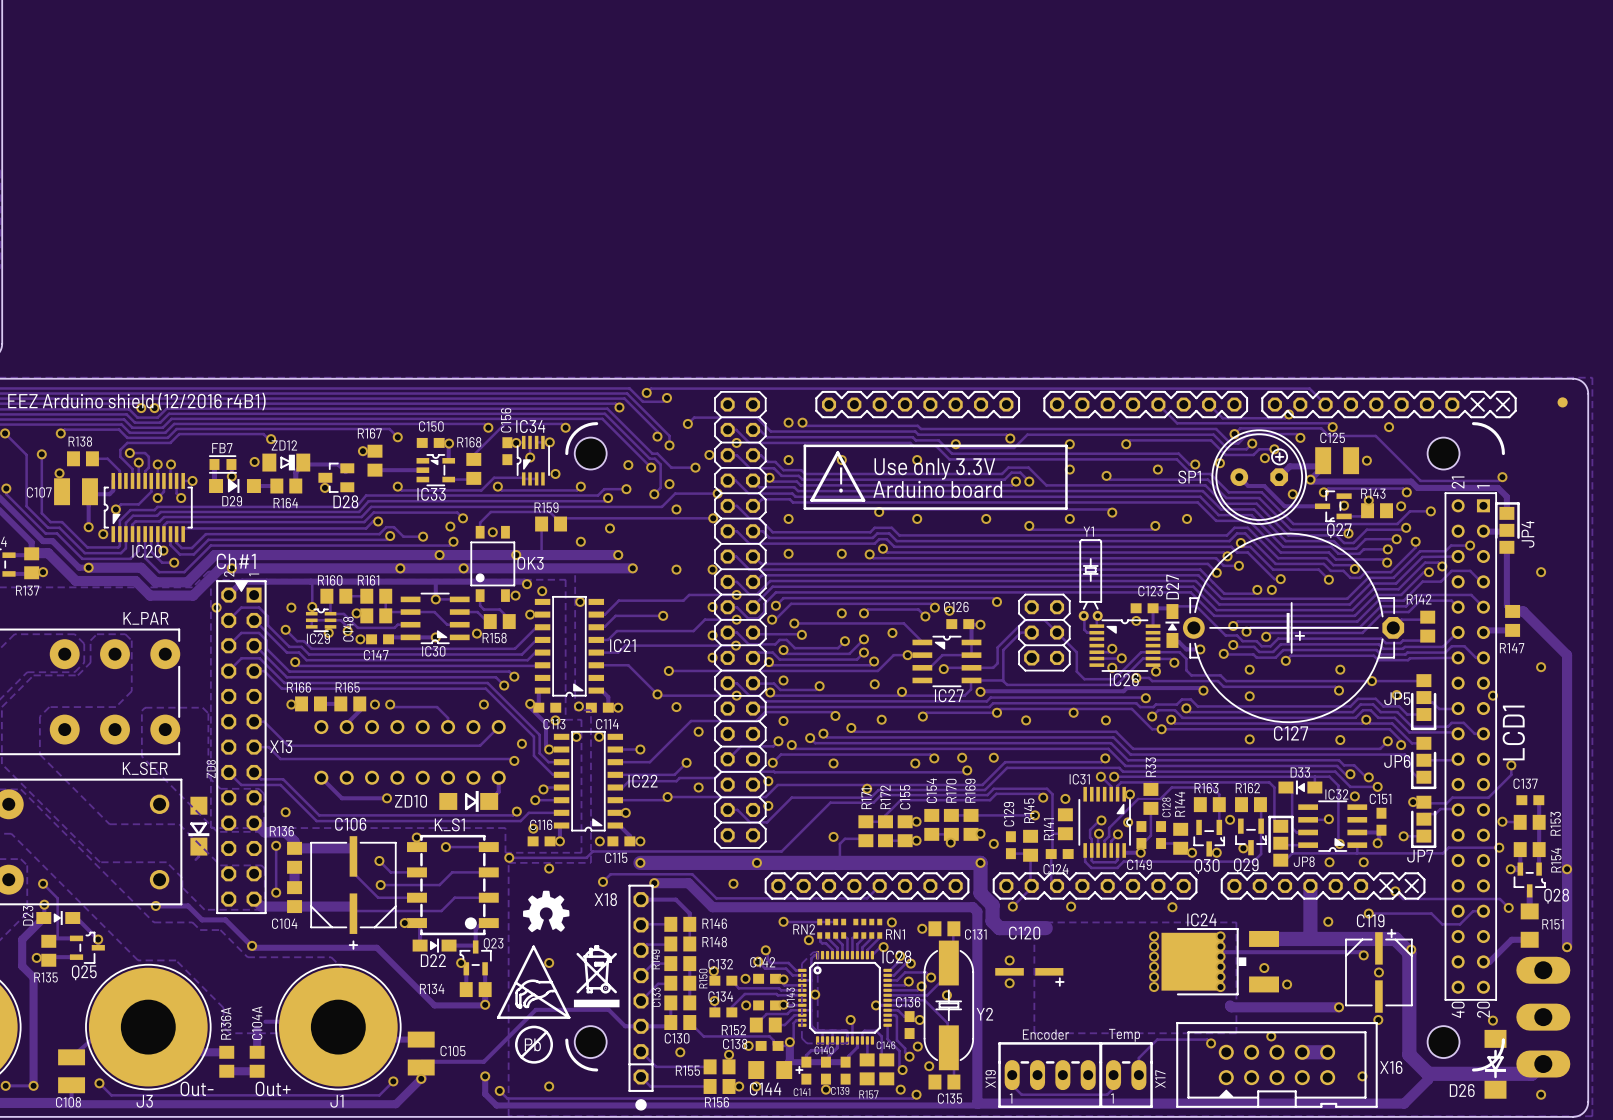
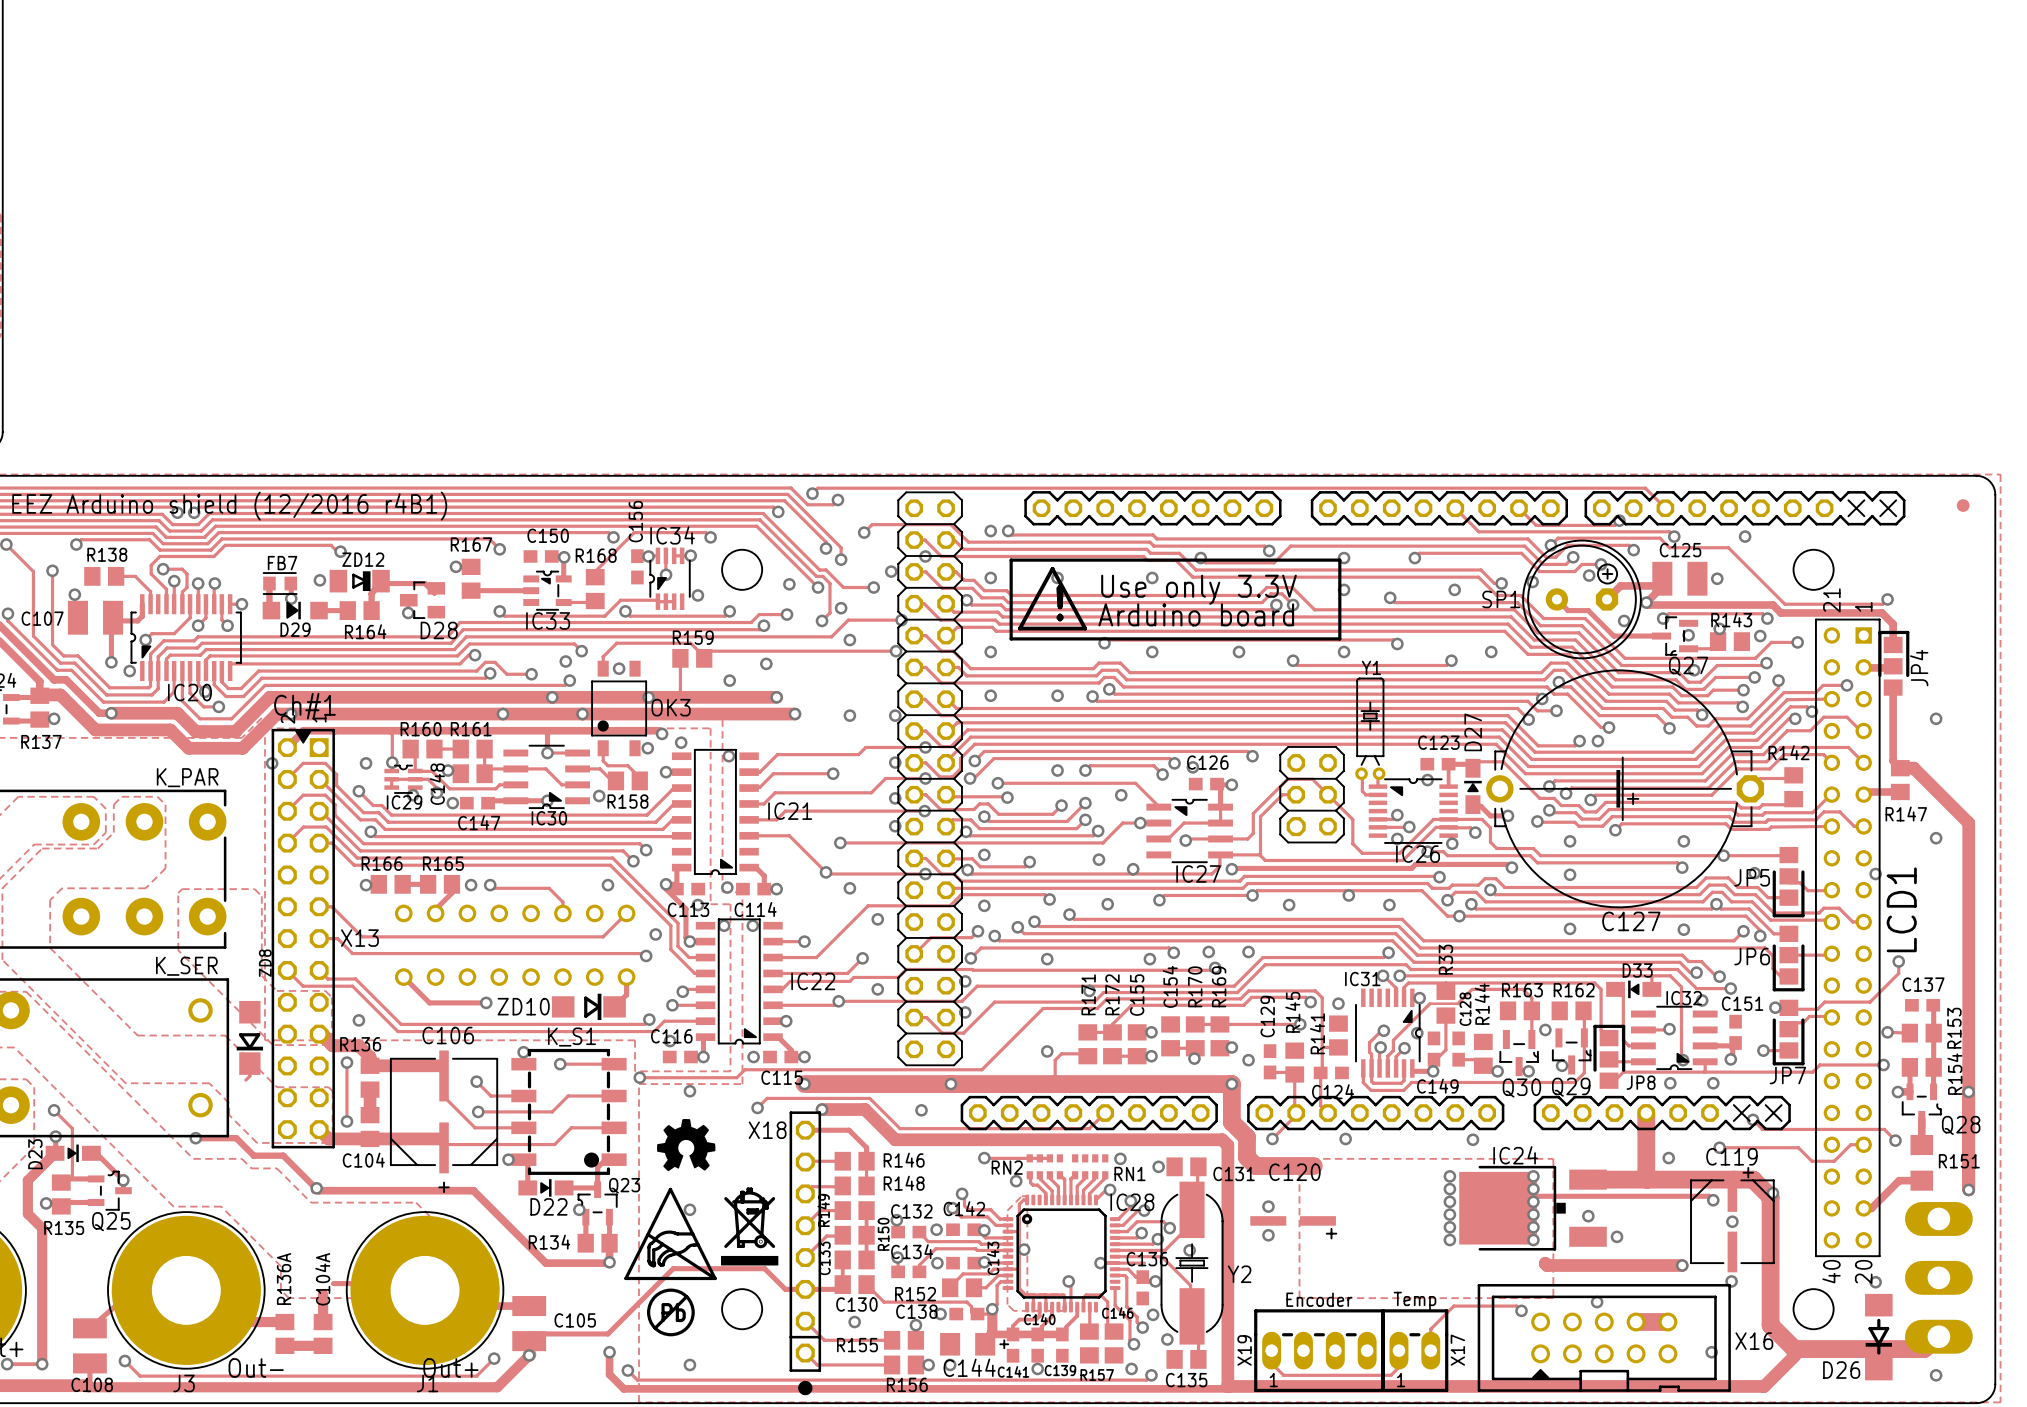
LCD1 footprint: [565, 422, 1505, 1072] -> [722, 549, 1881, 1330]

